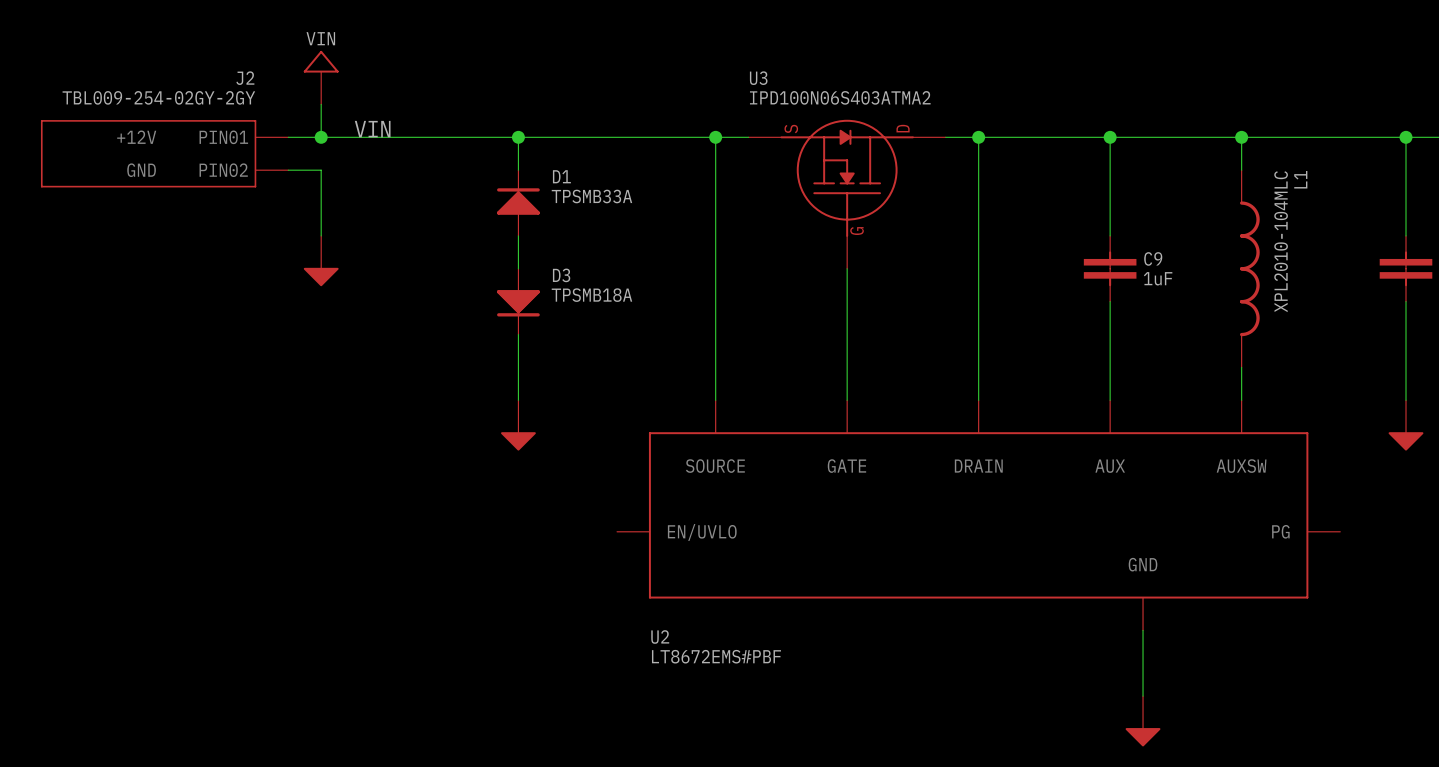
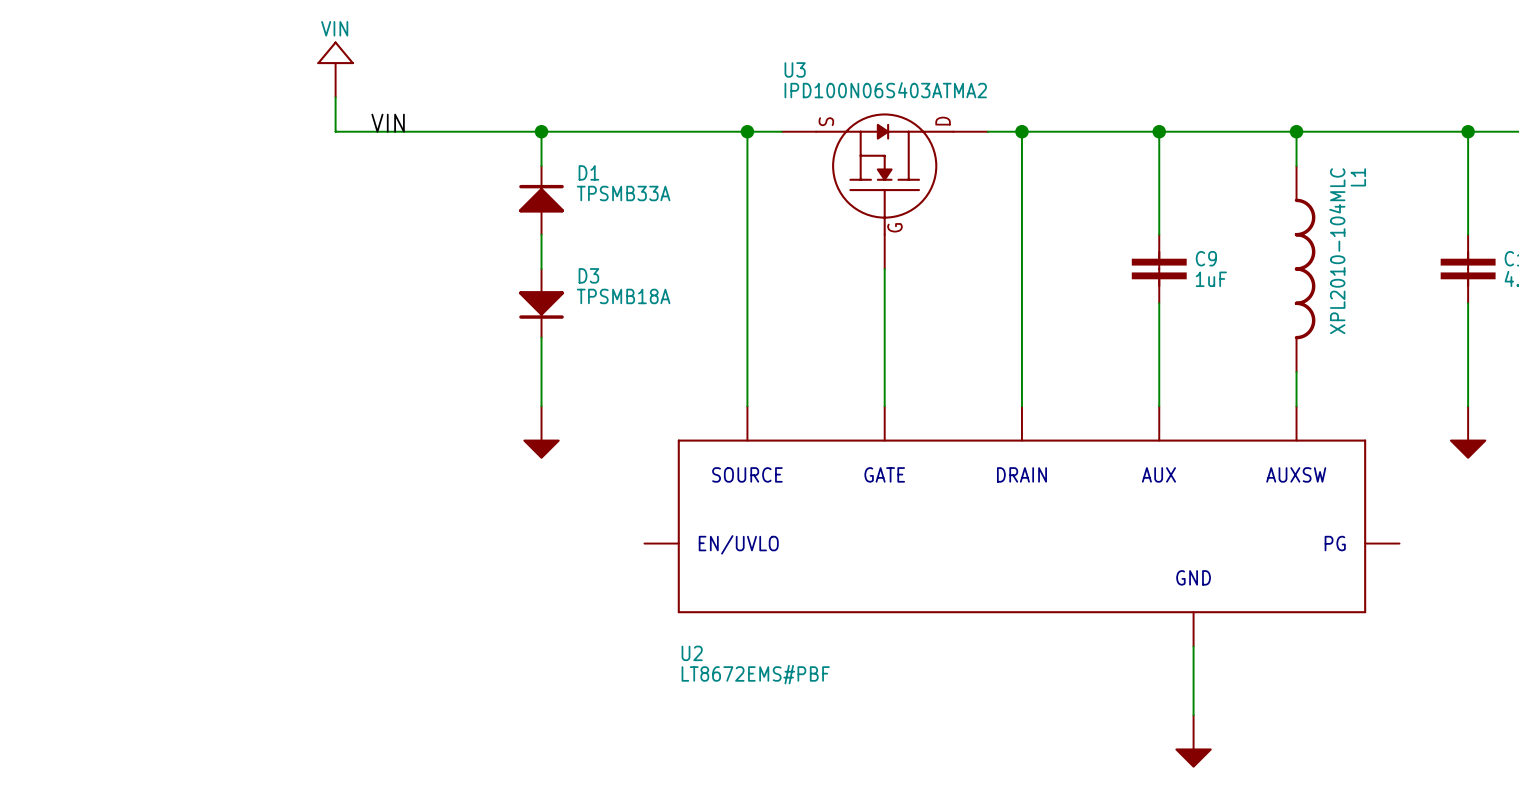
wire: (288, 137) (321, 137) -> none
junction: (321, 137) -> none
J2: TBL009-254-02GY-2GY (164, 153) -> none
wire: (288, 170) (321, 170) (321, 235) -> none
power symbol: (321, 261) -> none

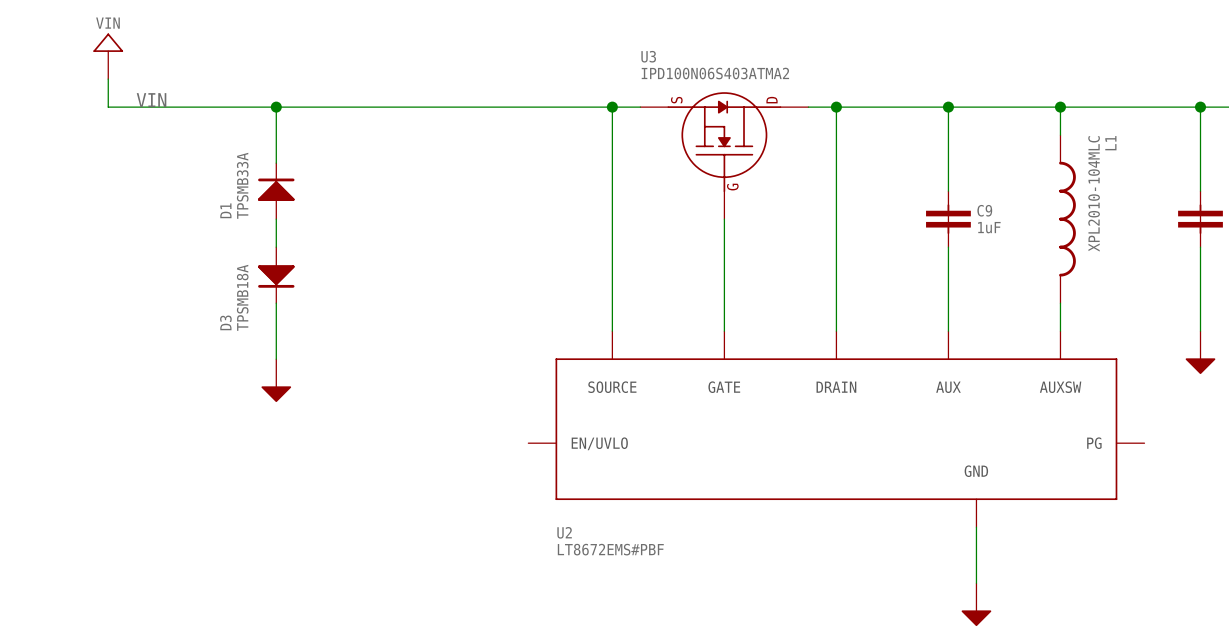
power symbol position: VIN (335, 69) -> VIN (108, 56)
wire: none -> (108, 79) (108, 107) (276, 107) (276, 163)
wire: (335, 97) (335, 131) -> none
label position: VIN (388, 123) -> VIN (151, 100)
junction: none -> (276, 107)
wire: (541, 131) (541, 166) -> none
junction: (541, 131) -> none
D1 name rotation: 0° (588, 172) -> 90° counterclockwise (225, 210)
D1 name position: D1 (588, 172) -> D1 (225, 210)
D1 value rotation: 0° (623, 193) -> 90° counterclockwise (242, 185)
D1 value position: TPSMB33A (623, 193) -> TPSMB33A (242, 185)
D1 position: (541, 200) -> (276, 191)
wire: (541, 234) (541, 269) -> (276, 219) (276, 247)
D3 name rotation: 0° (588, 275) -> 90° counterclockwise (225, 322)
D3 name position: D3 (588, 275) -> D3 (225, 322)
D3 value rotation: 0° (623, 296) -> 90° counterclockwise (242, 297)
D3 value position: TPSMB18A (623, 296) -> TPSMB18A (242, 297)
D3 position: (541, 303) -> (276, 275)
wire: (541, 337) (541, 406) -> (276, 303) (276, 359)
power symbol position: (541, 432) -> (276, 380)

